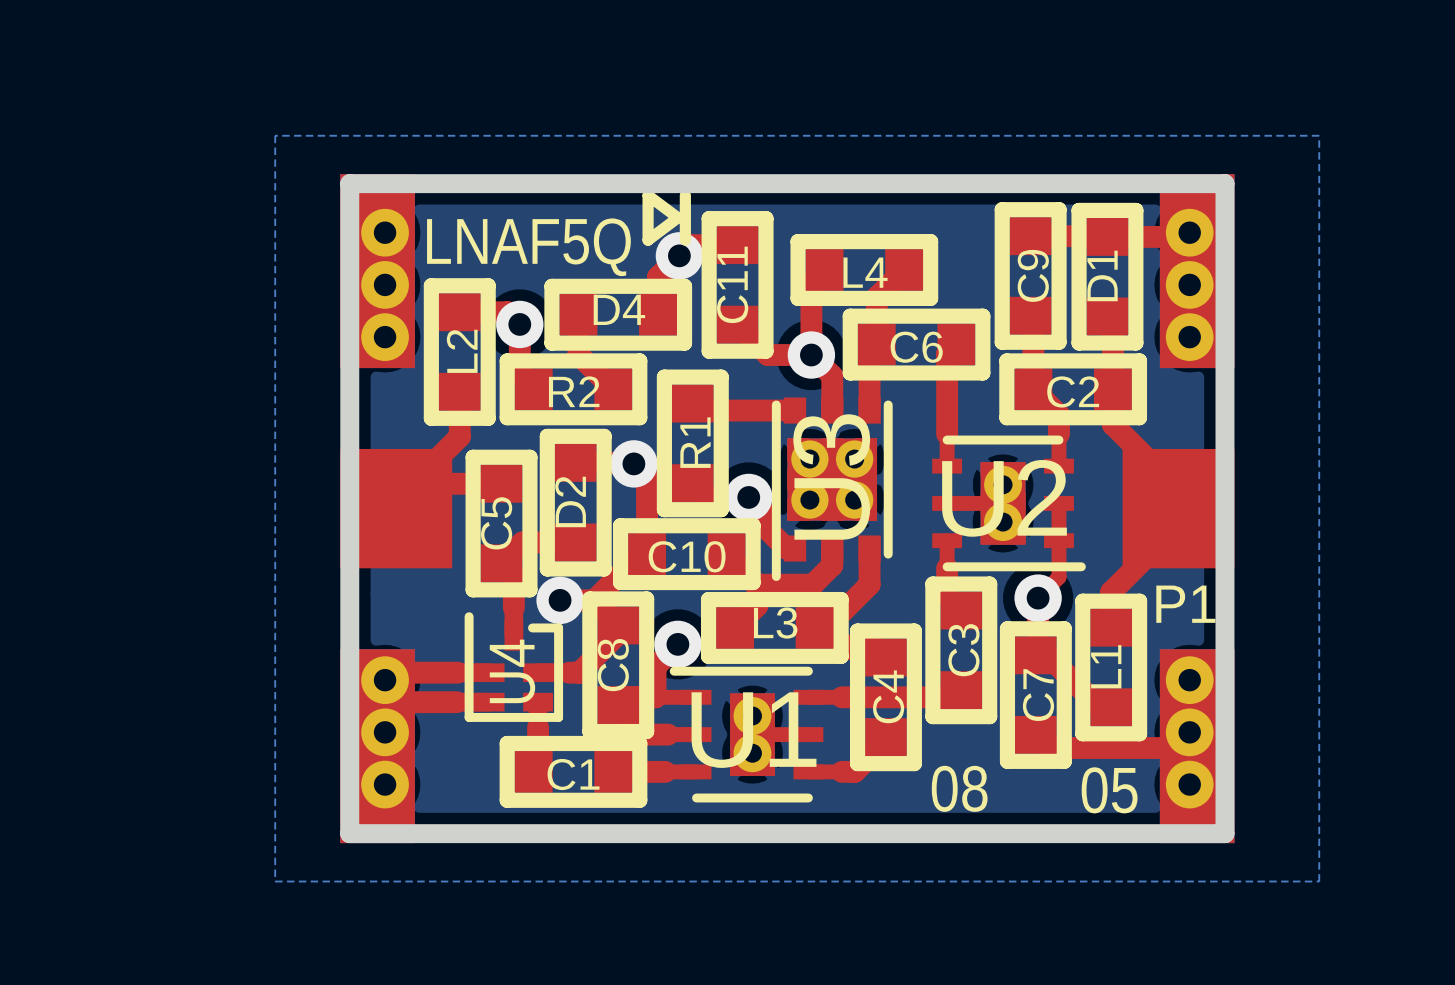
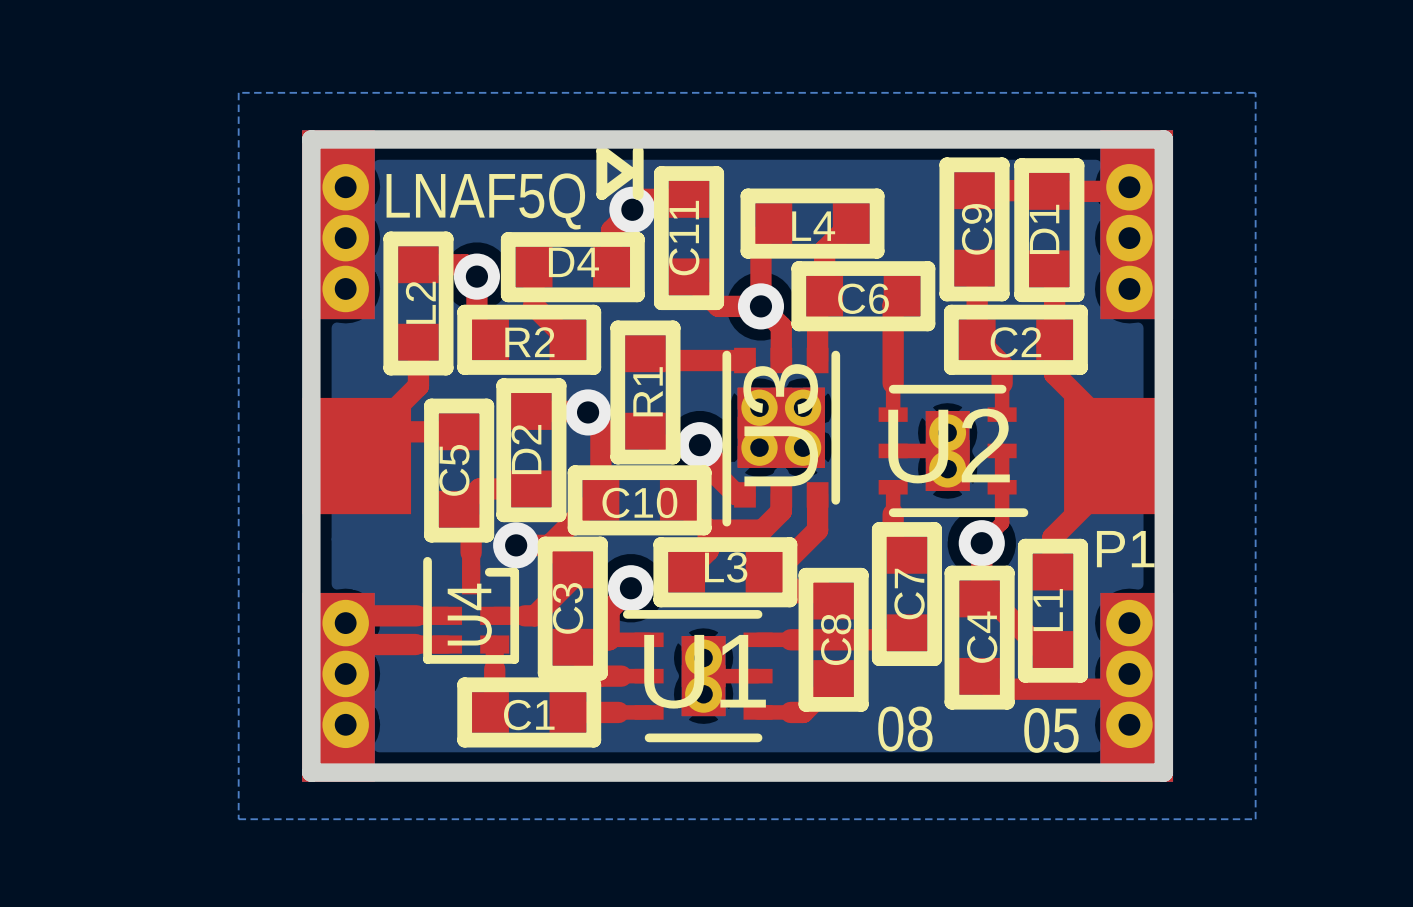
C3 name: C3 (963, 650) -> C7 (909, 594)
C8 name: C8 (613, 665) -> C3 (568, 608)
C7 name: C7 (1038, 695) -> C4 (982, 637)
C4 name: C4 (888, 696) -> C8 (836, 639)

